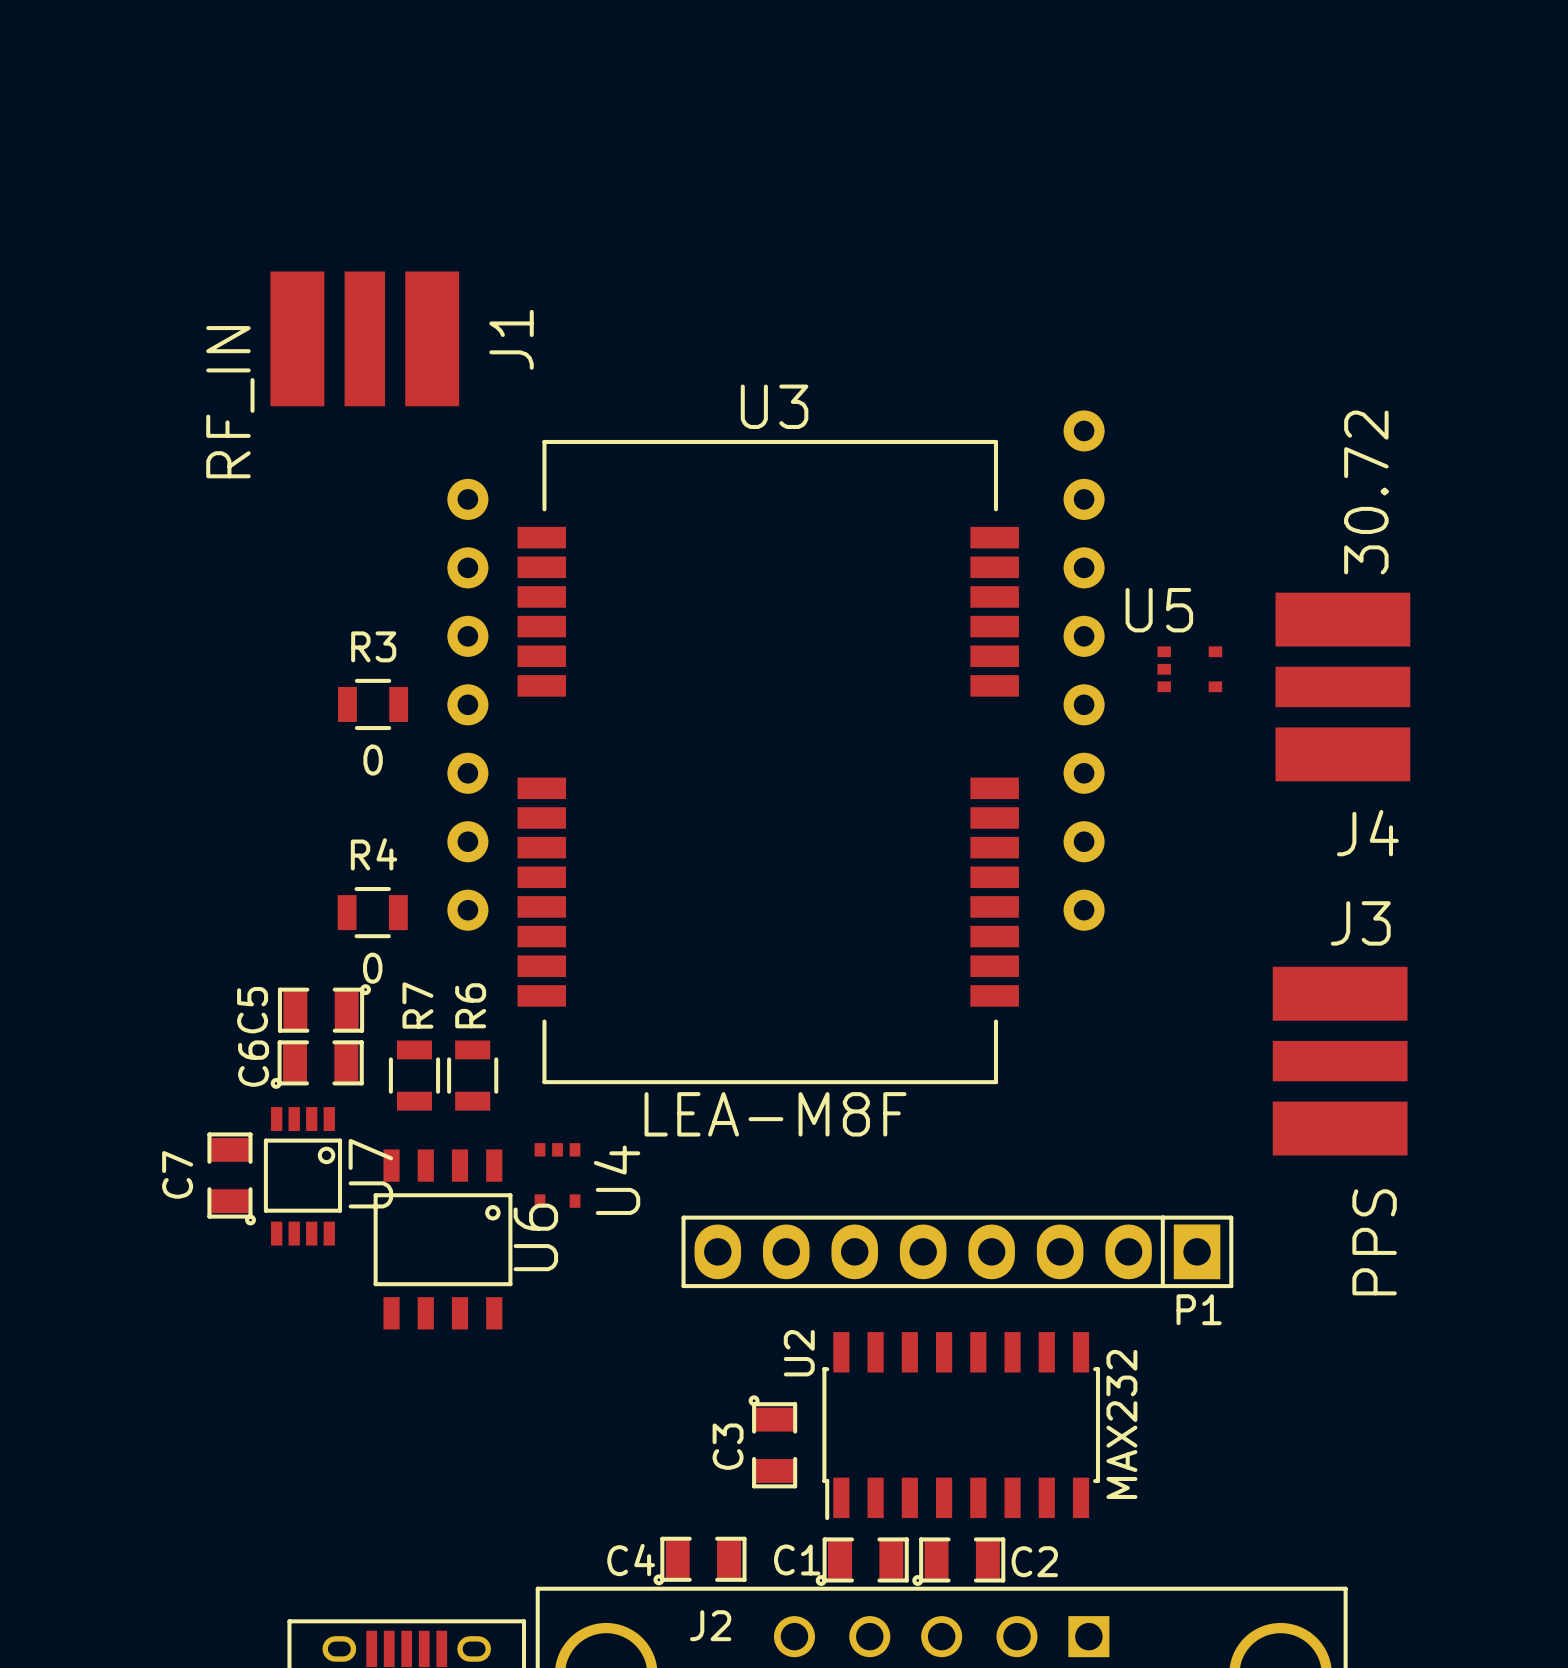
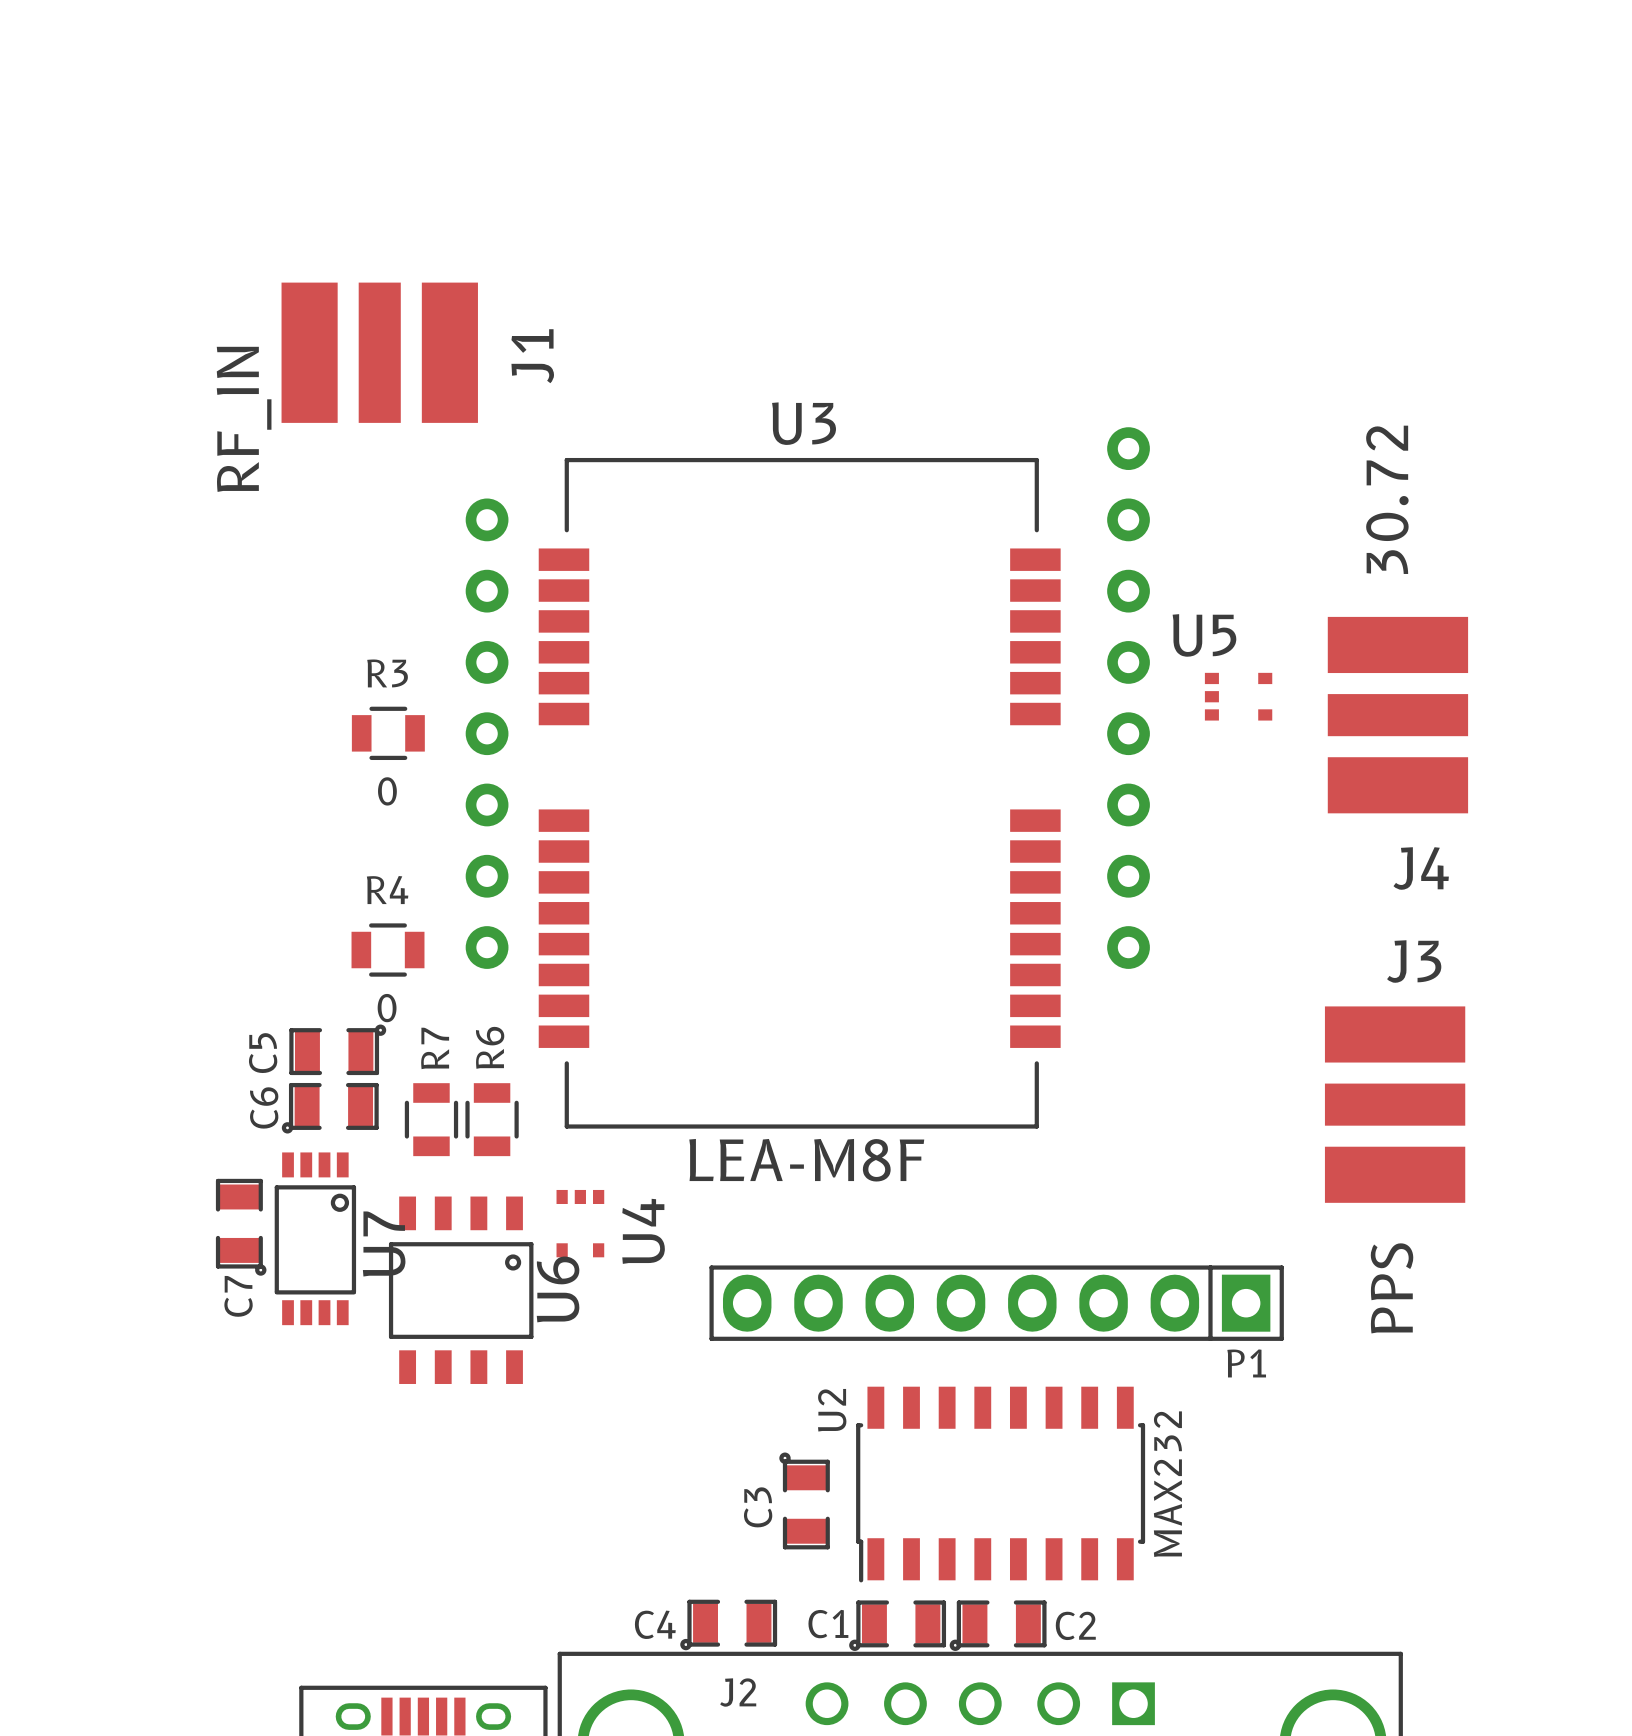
J4 value position: 30.72 (1366, 492) -> 30.72 (1387, 499)
U7 footprint: [263, 1107, 343, 1246] -> [274, 1152, 357, 1326]
C7 name position: C7 (177, 1174) -> C7 (238, 1296)
J3 value position: PPS (1374, 1242) -> PPS (1392, 1288)

